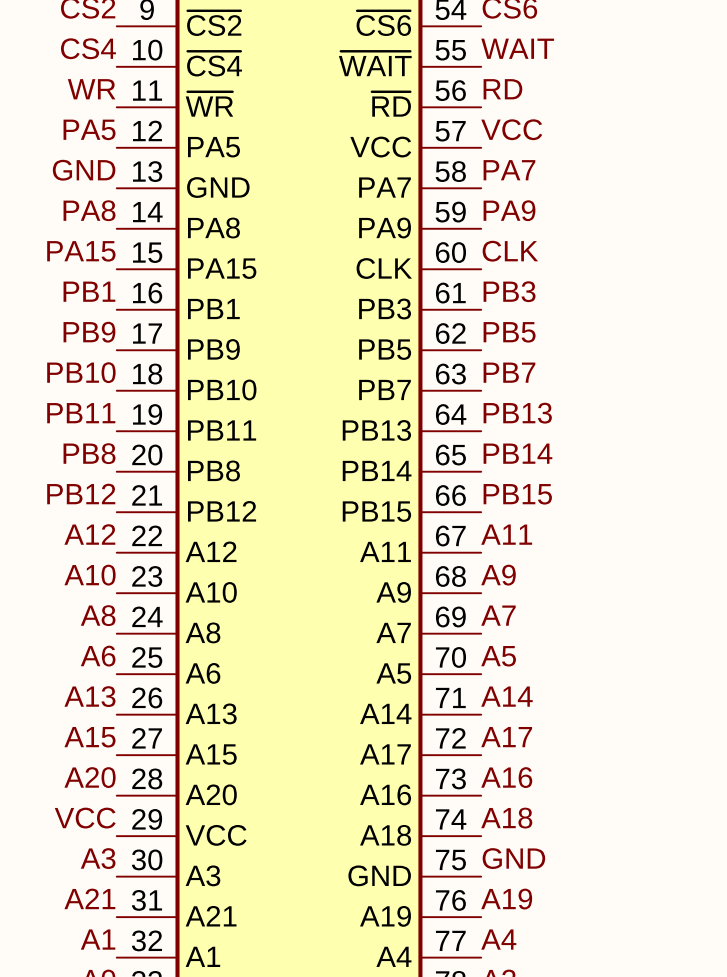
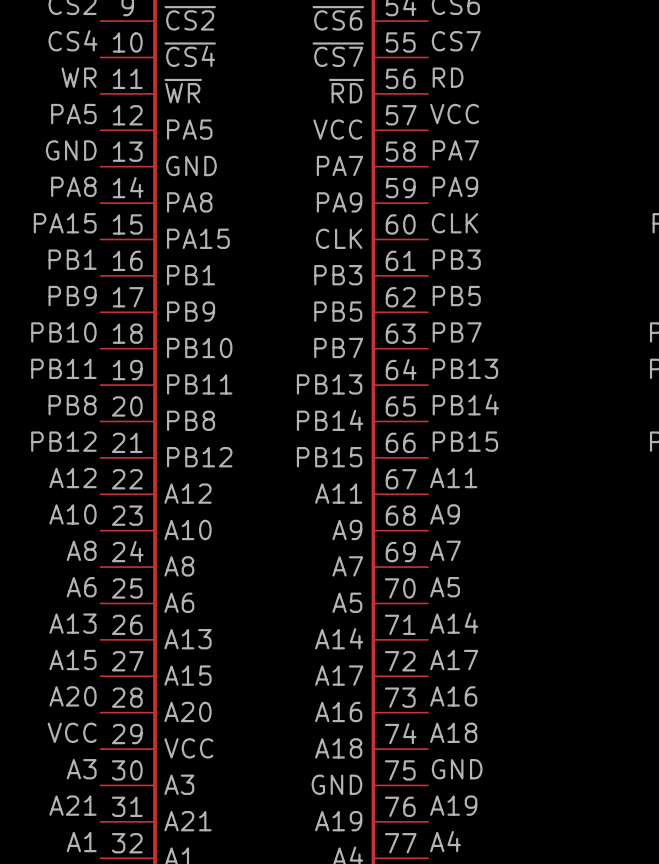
label: WAIT (517, 48) -> CS7 (456, 41)
part pin name: ~{WAIT} (375, 63) -> ~{CS7} (338, 54)

